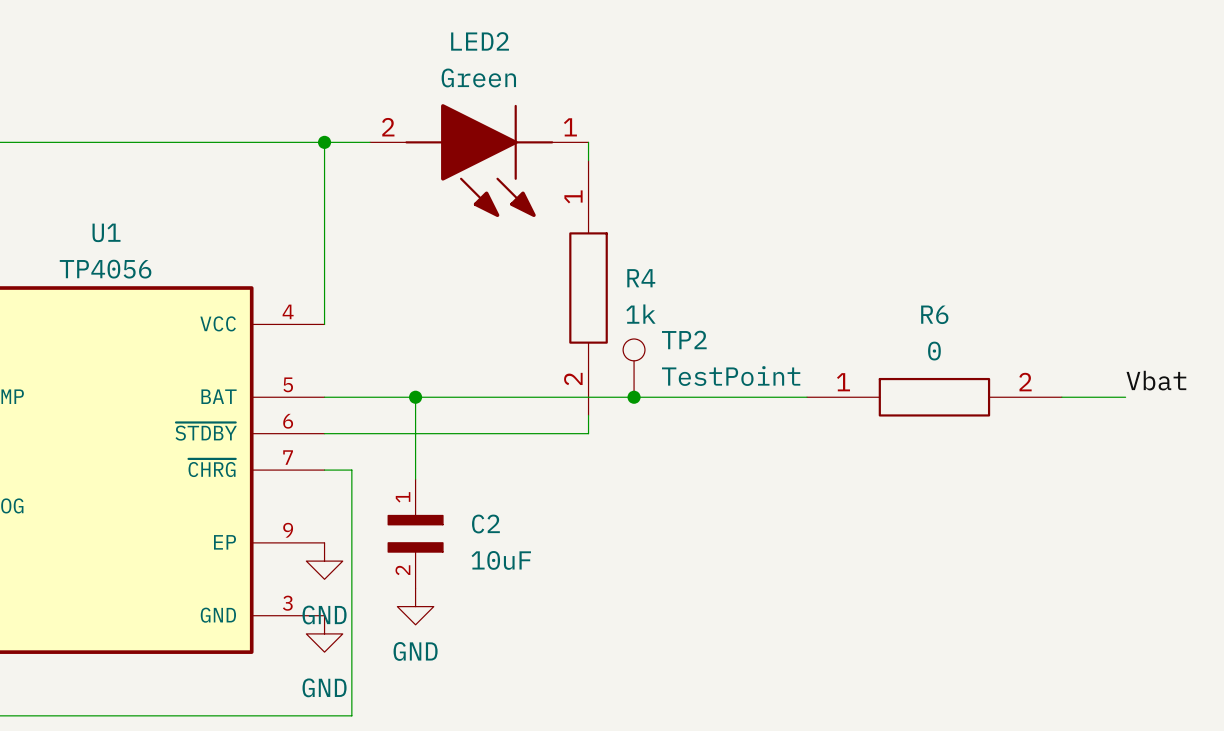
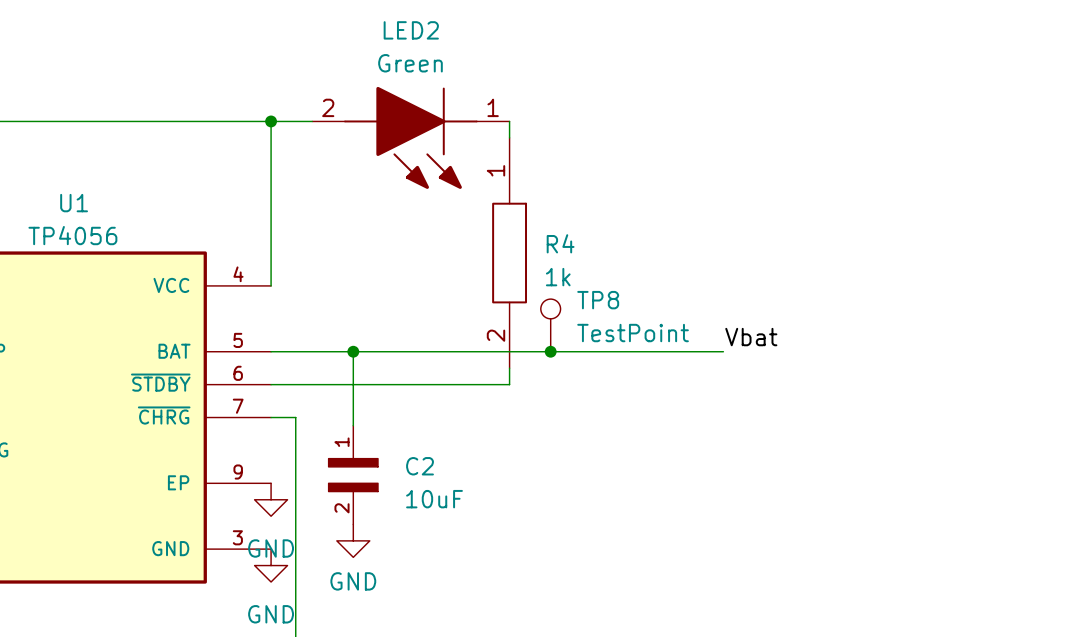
TP2 name: TP2 (684, 339) -> TP8 (598, 300)
label position: Vbat (1156, 380) -> Vbat (751, 337)
R6: 0 (934, 397) -> none
wire: (1061, 397) (1125, 397) -> none

